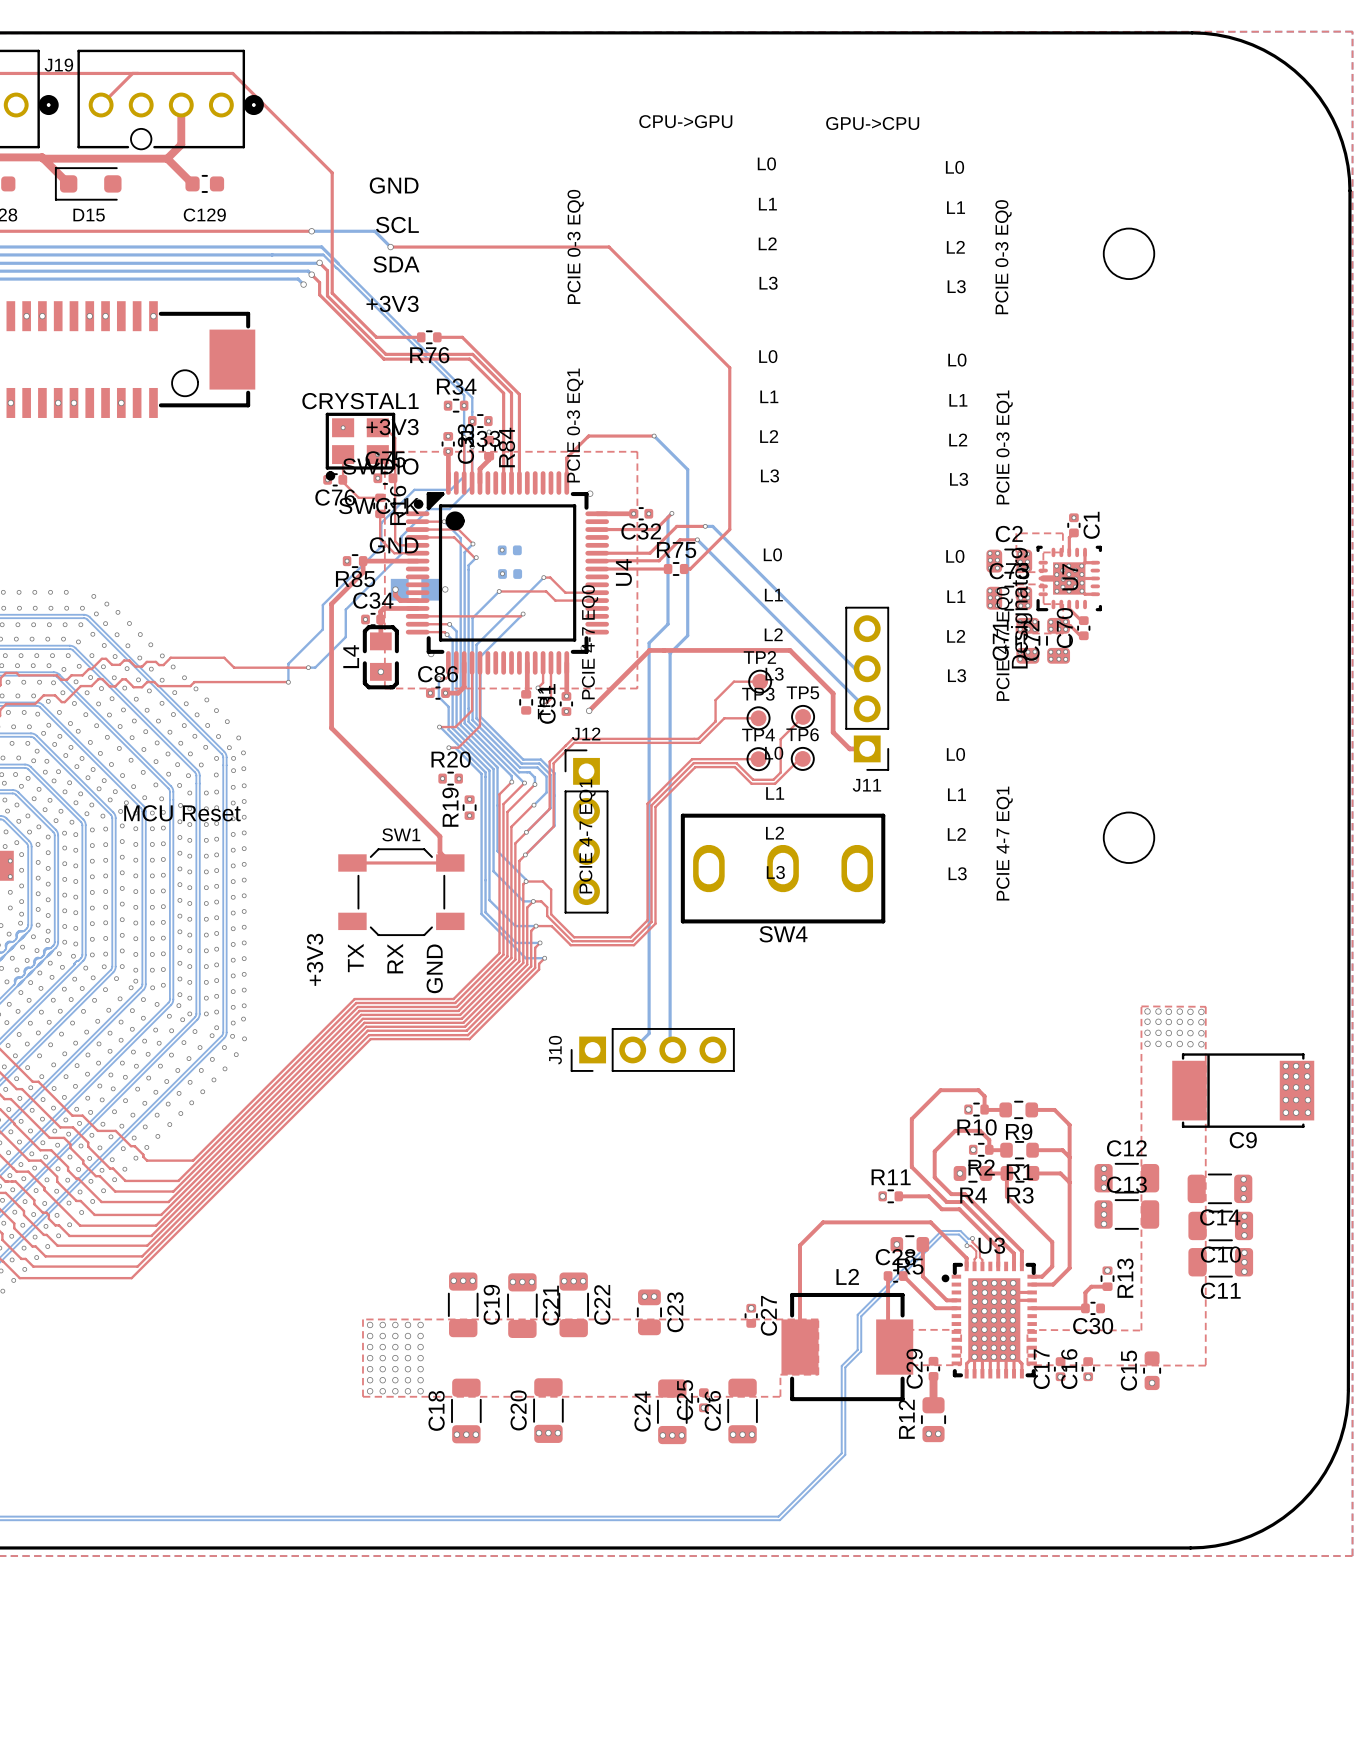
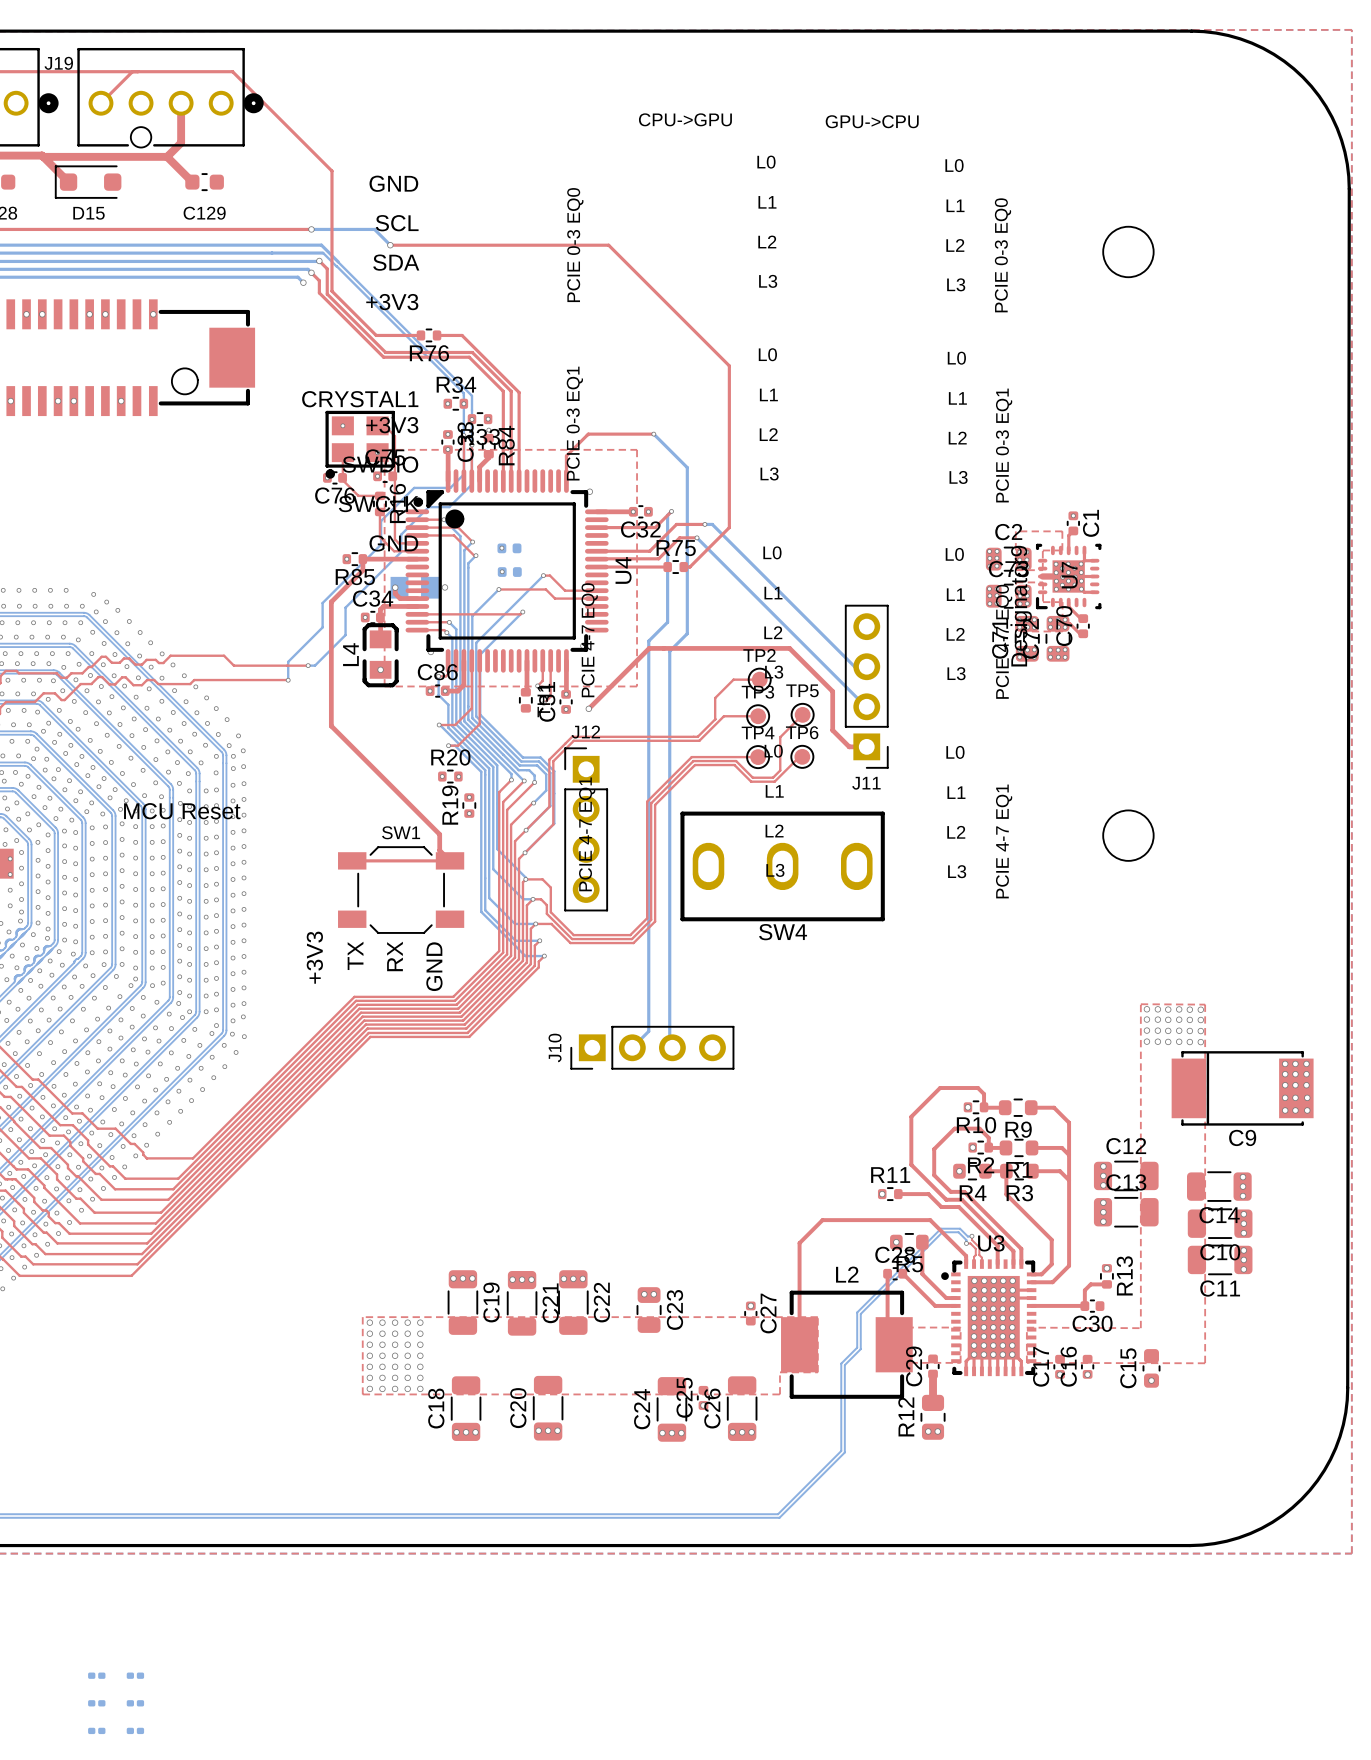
part: none -> (96, 1675)
part: none -> (135, 1675)
part: none -> (96, 1703)
part: none -> (135, 1703)
part: none -> (96, 1730)
part: none -> (135, 1730)

